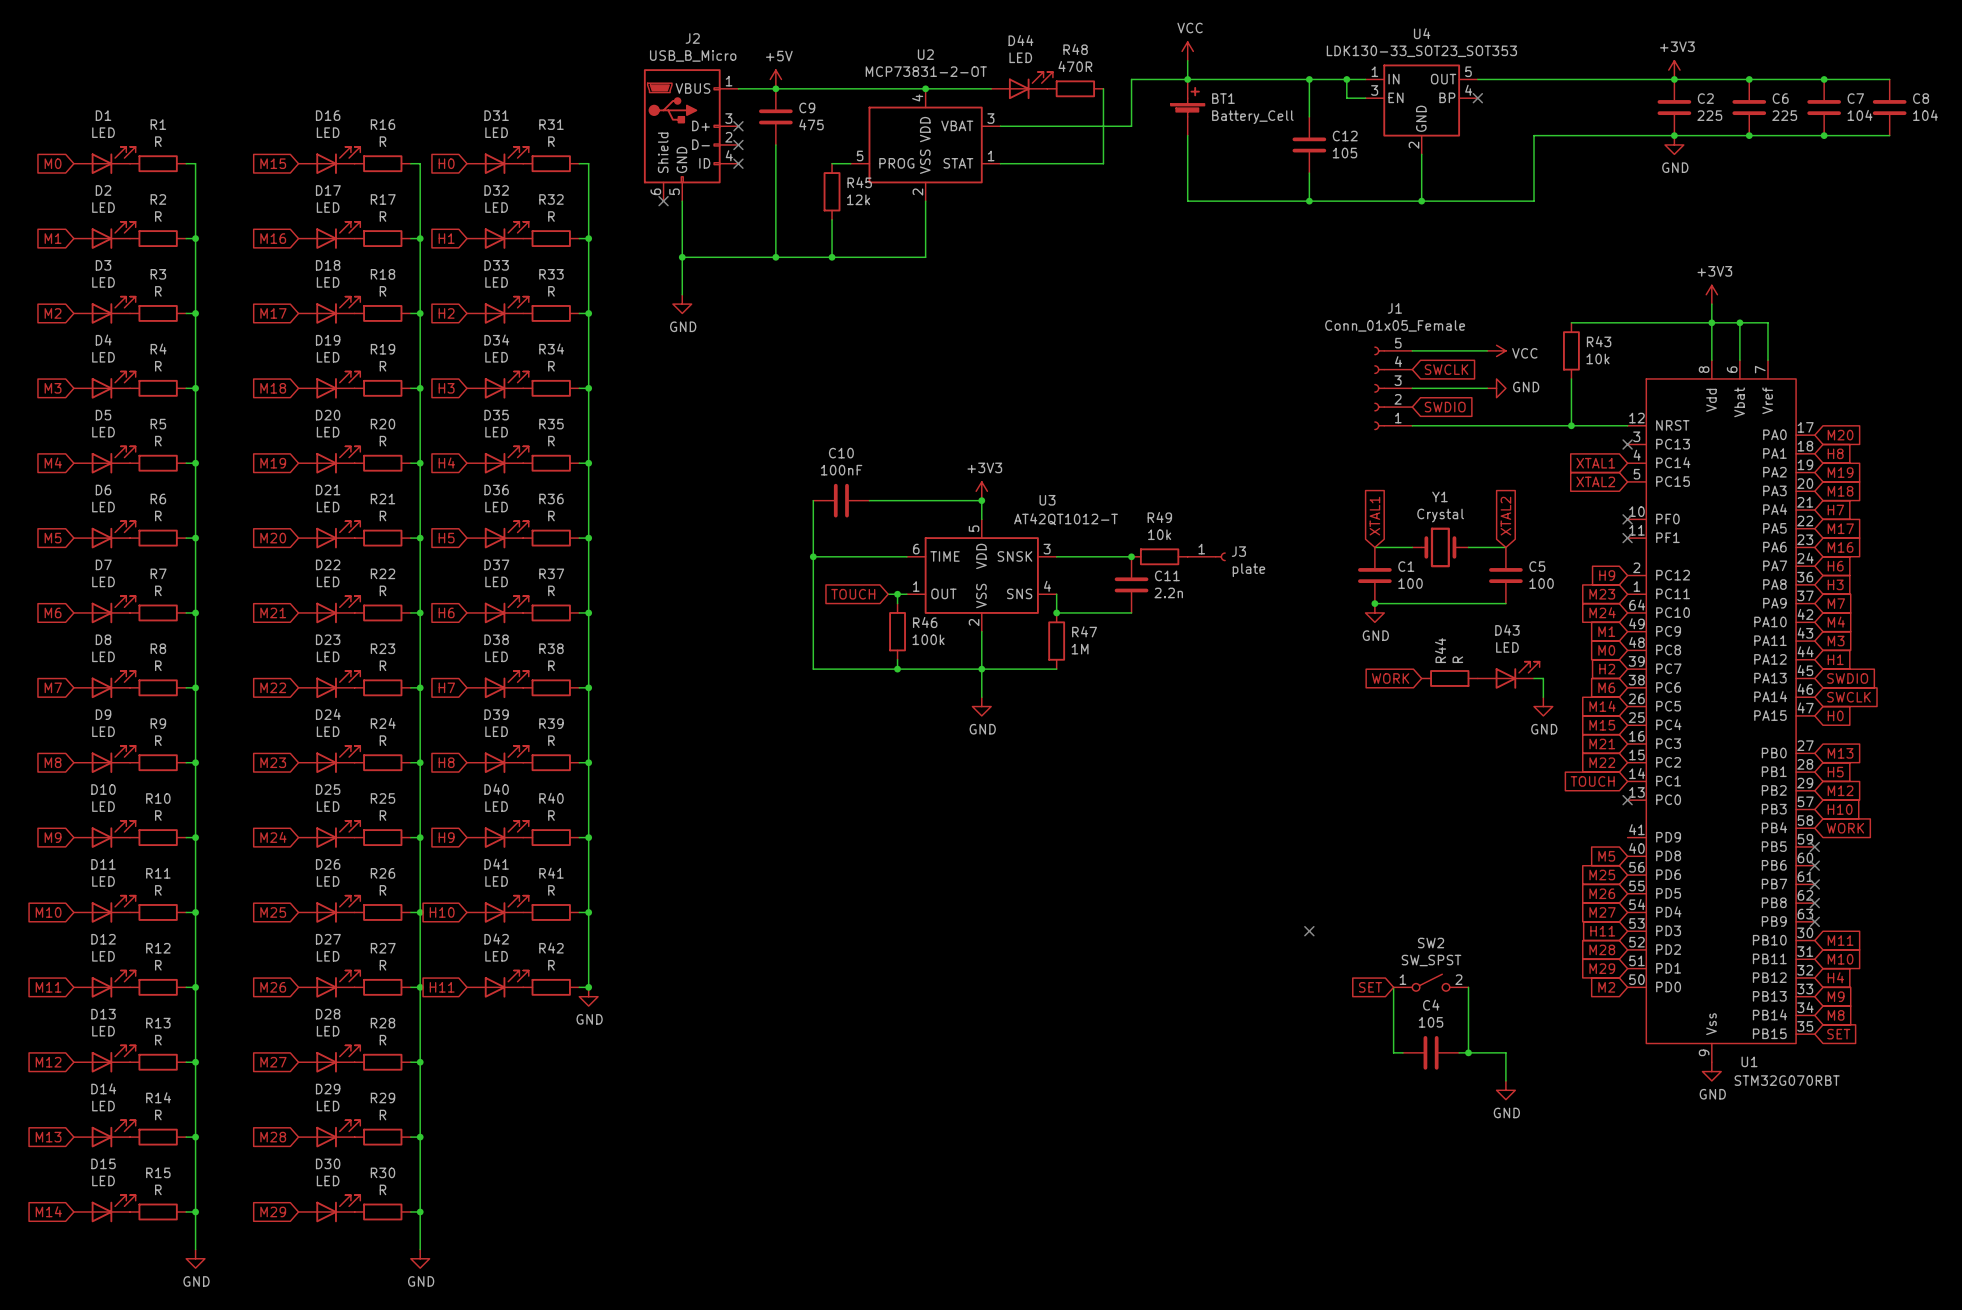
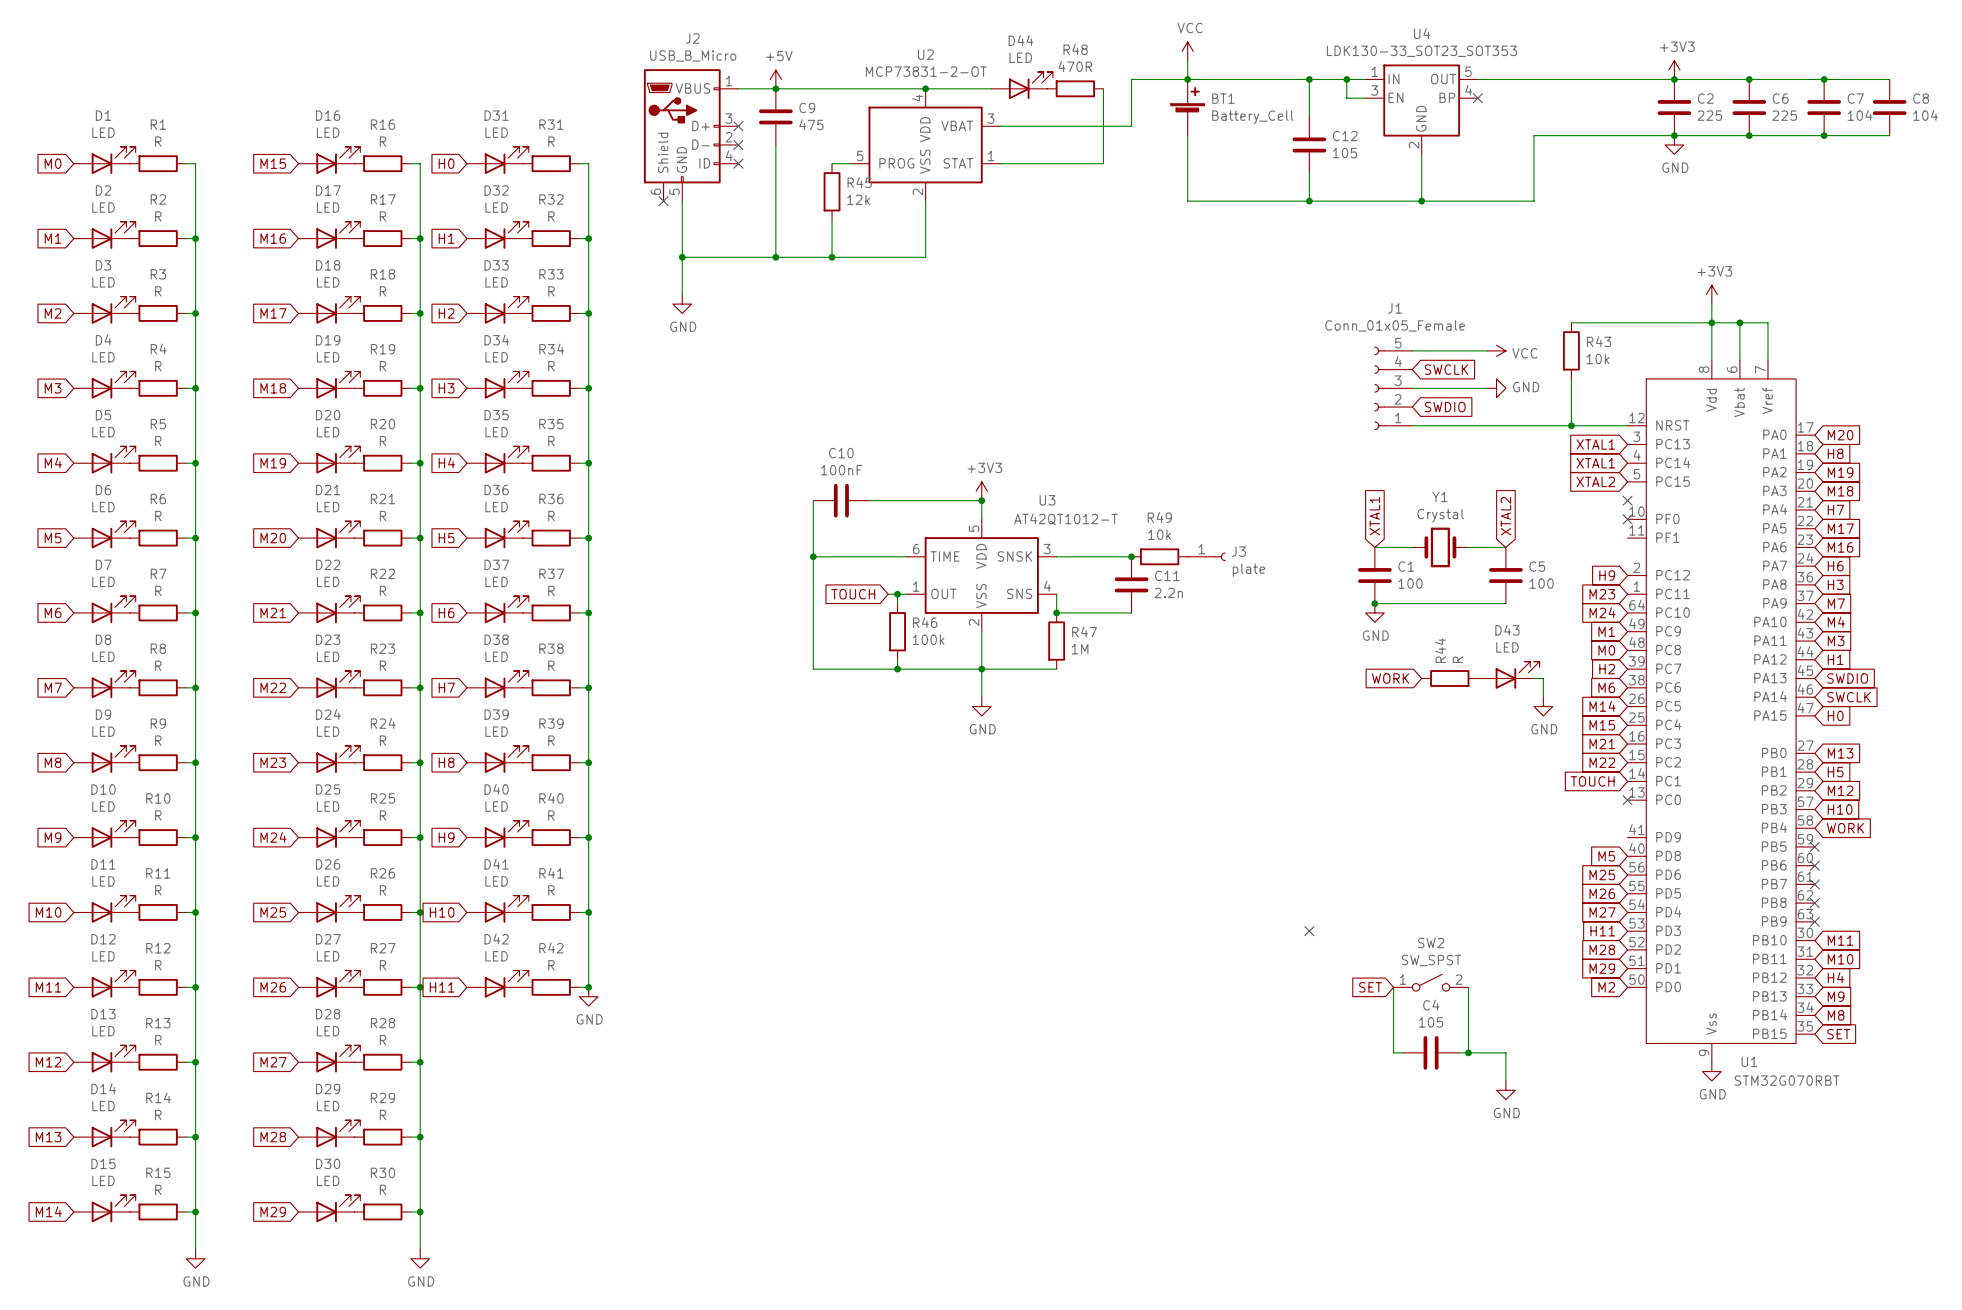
global label: none -> XTAL1 (1595, 444)
no-connect mark: (1627, 444) -> none
no-connect mark: none -> (1627, 500)
no-connect mark: (1627, 538) -> none

